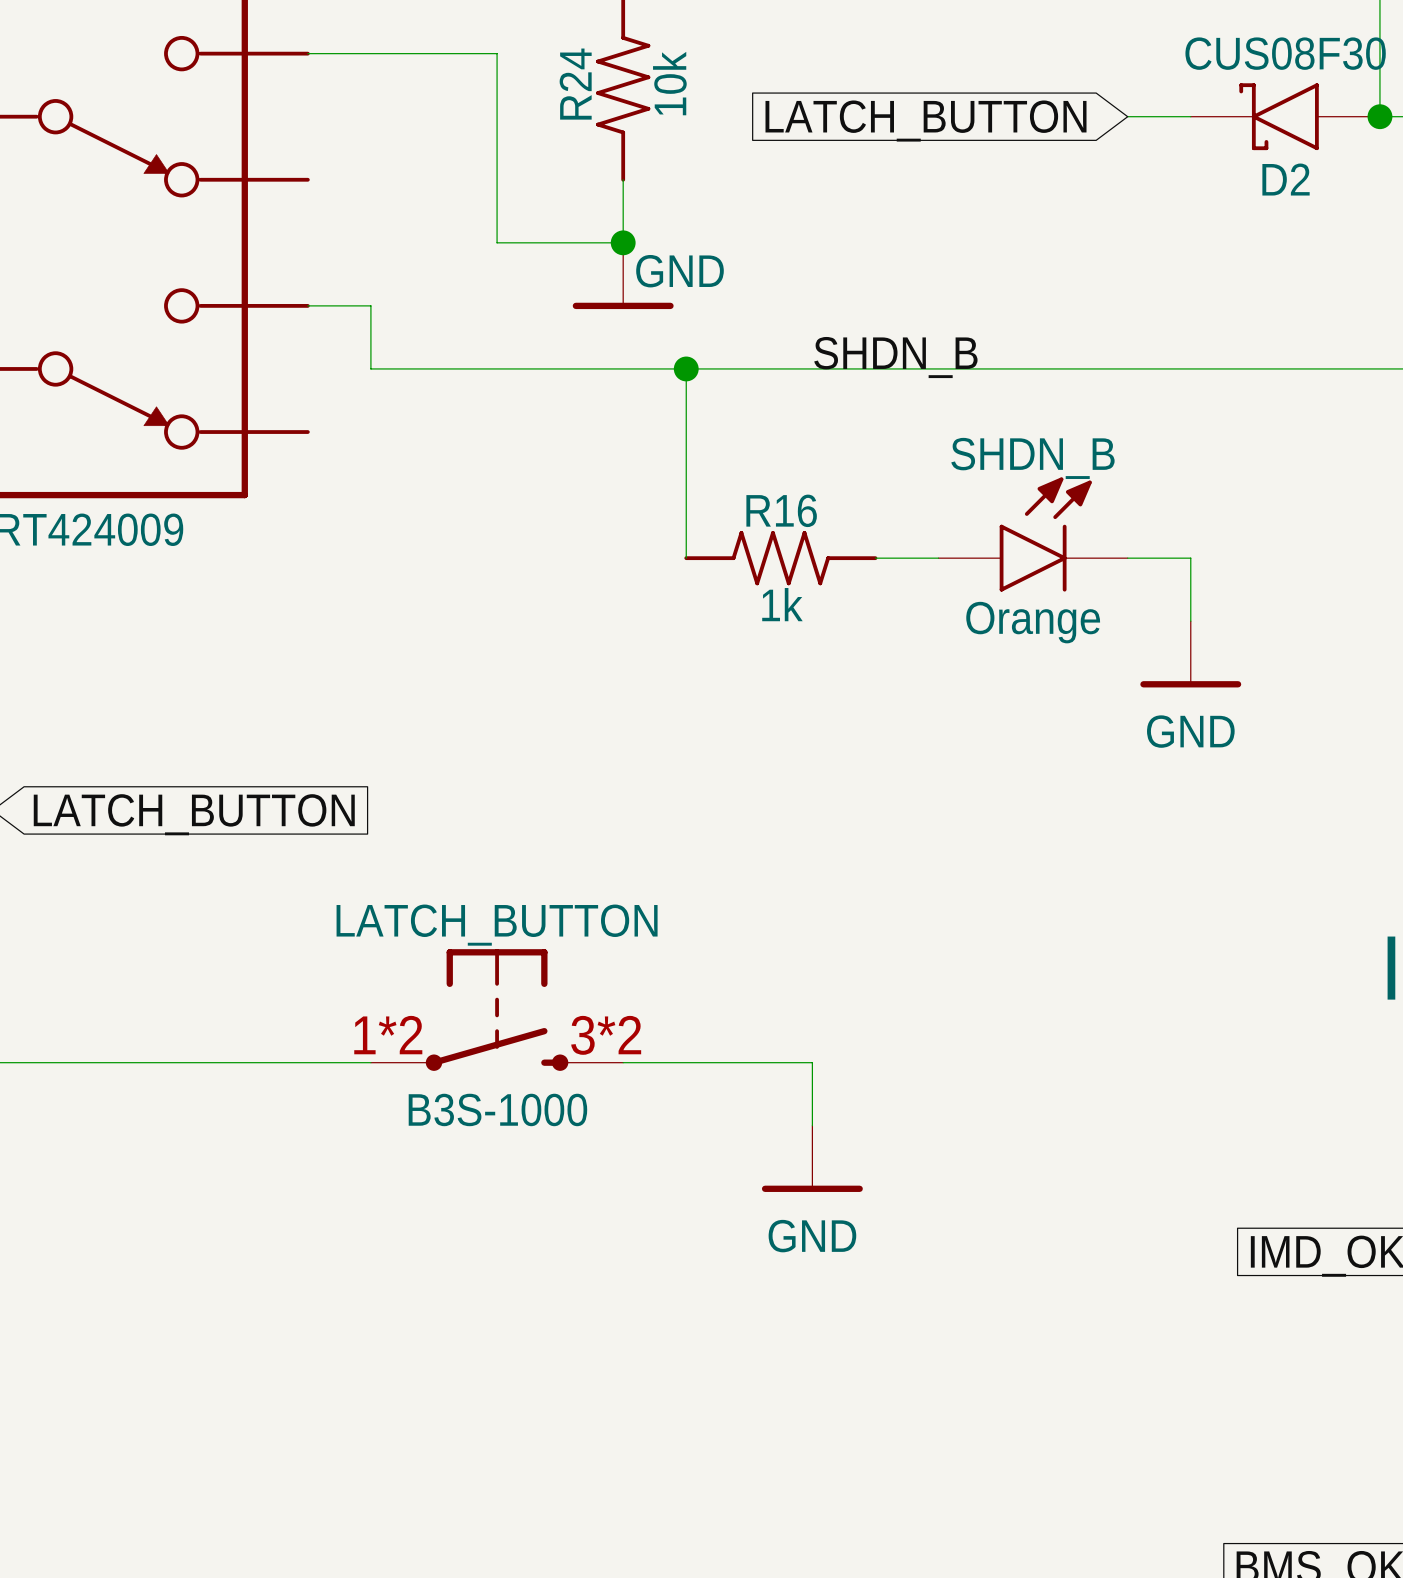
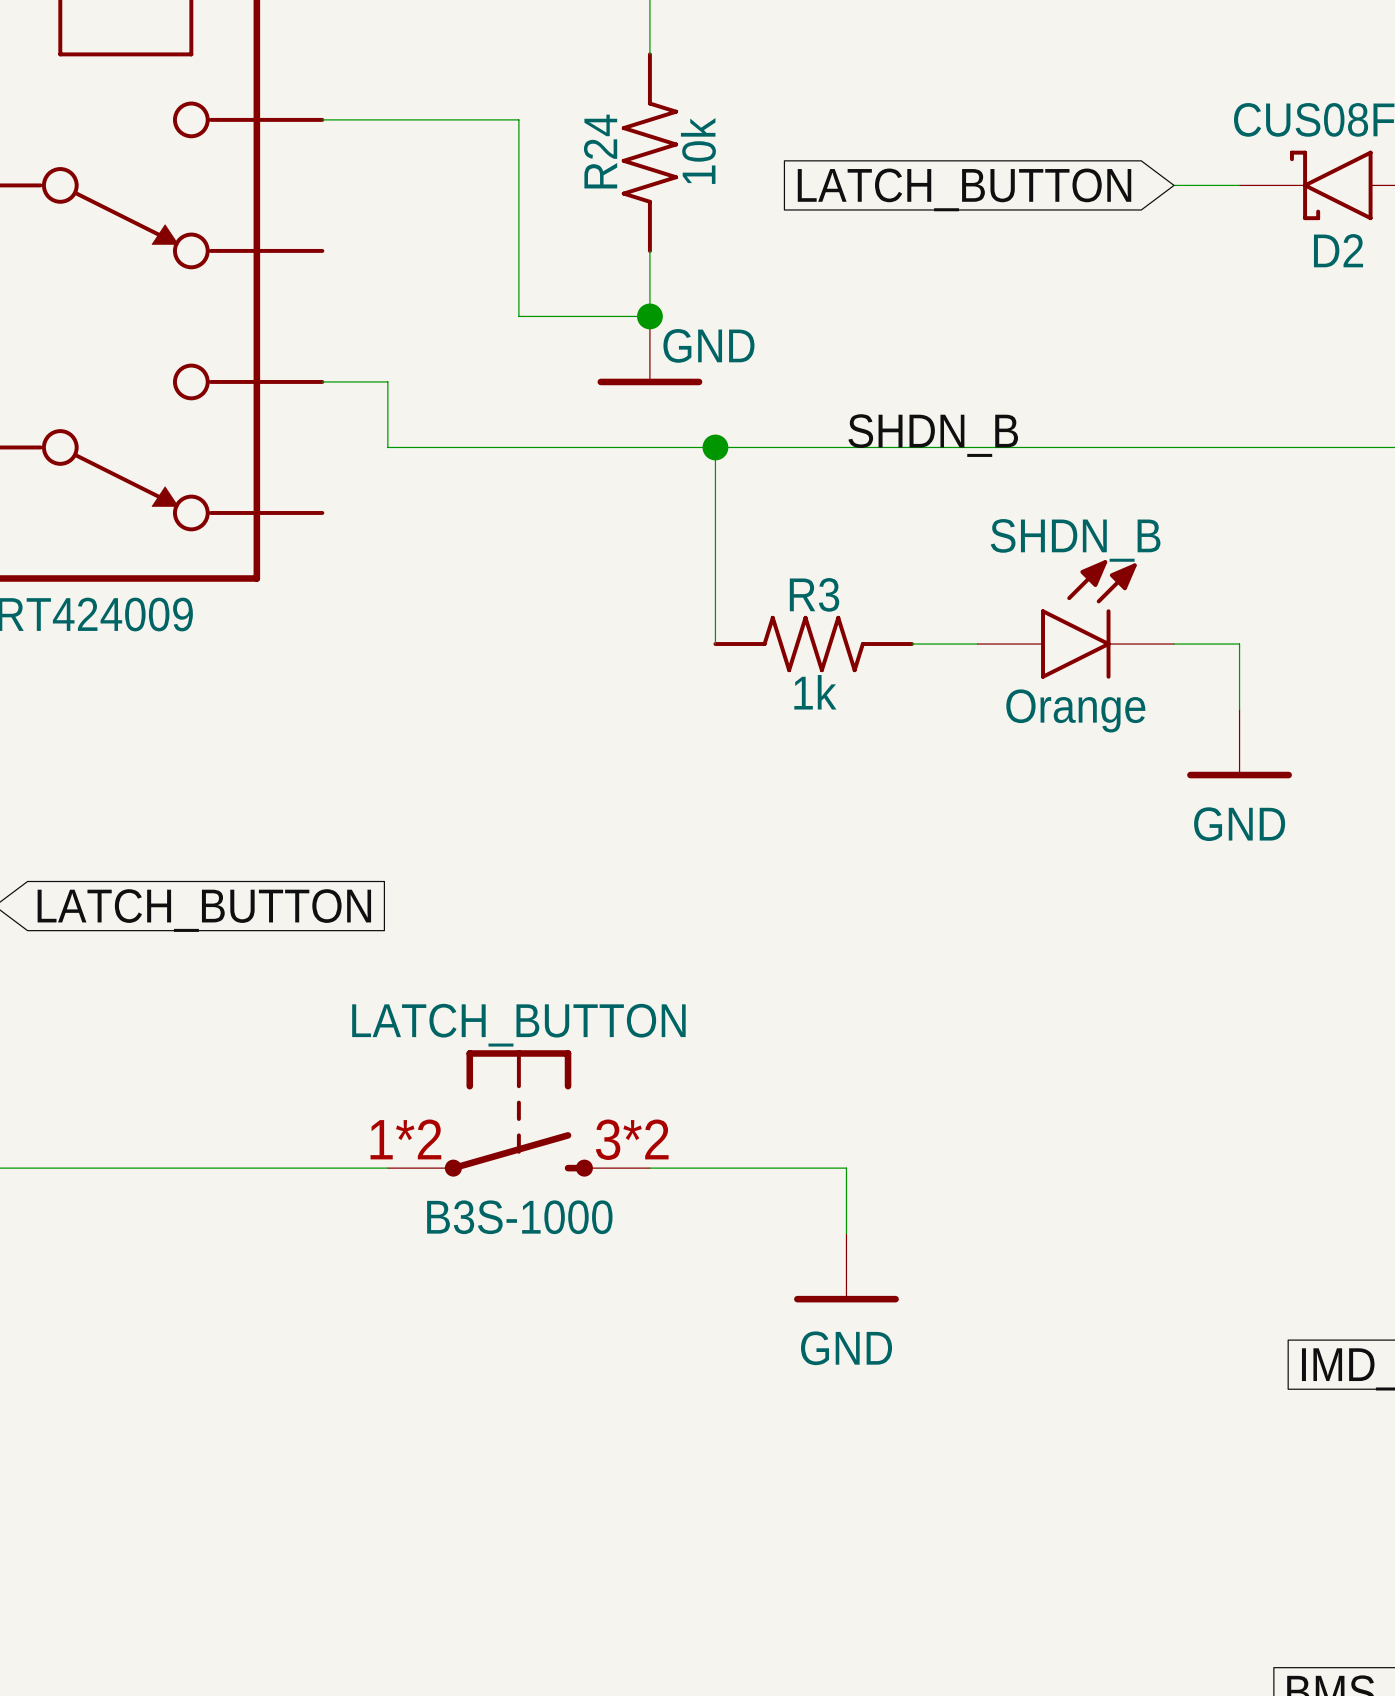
R16 name: R16 (781, 510) -> R3 (814, 594)

